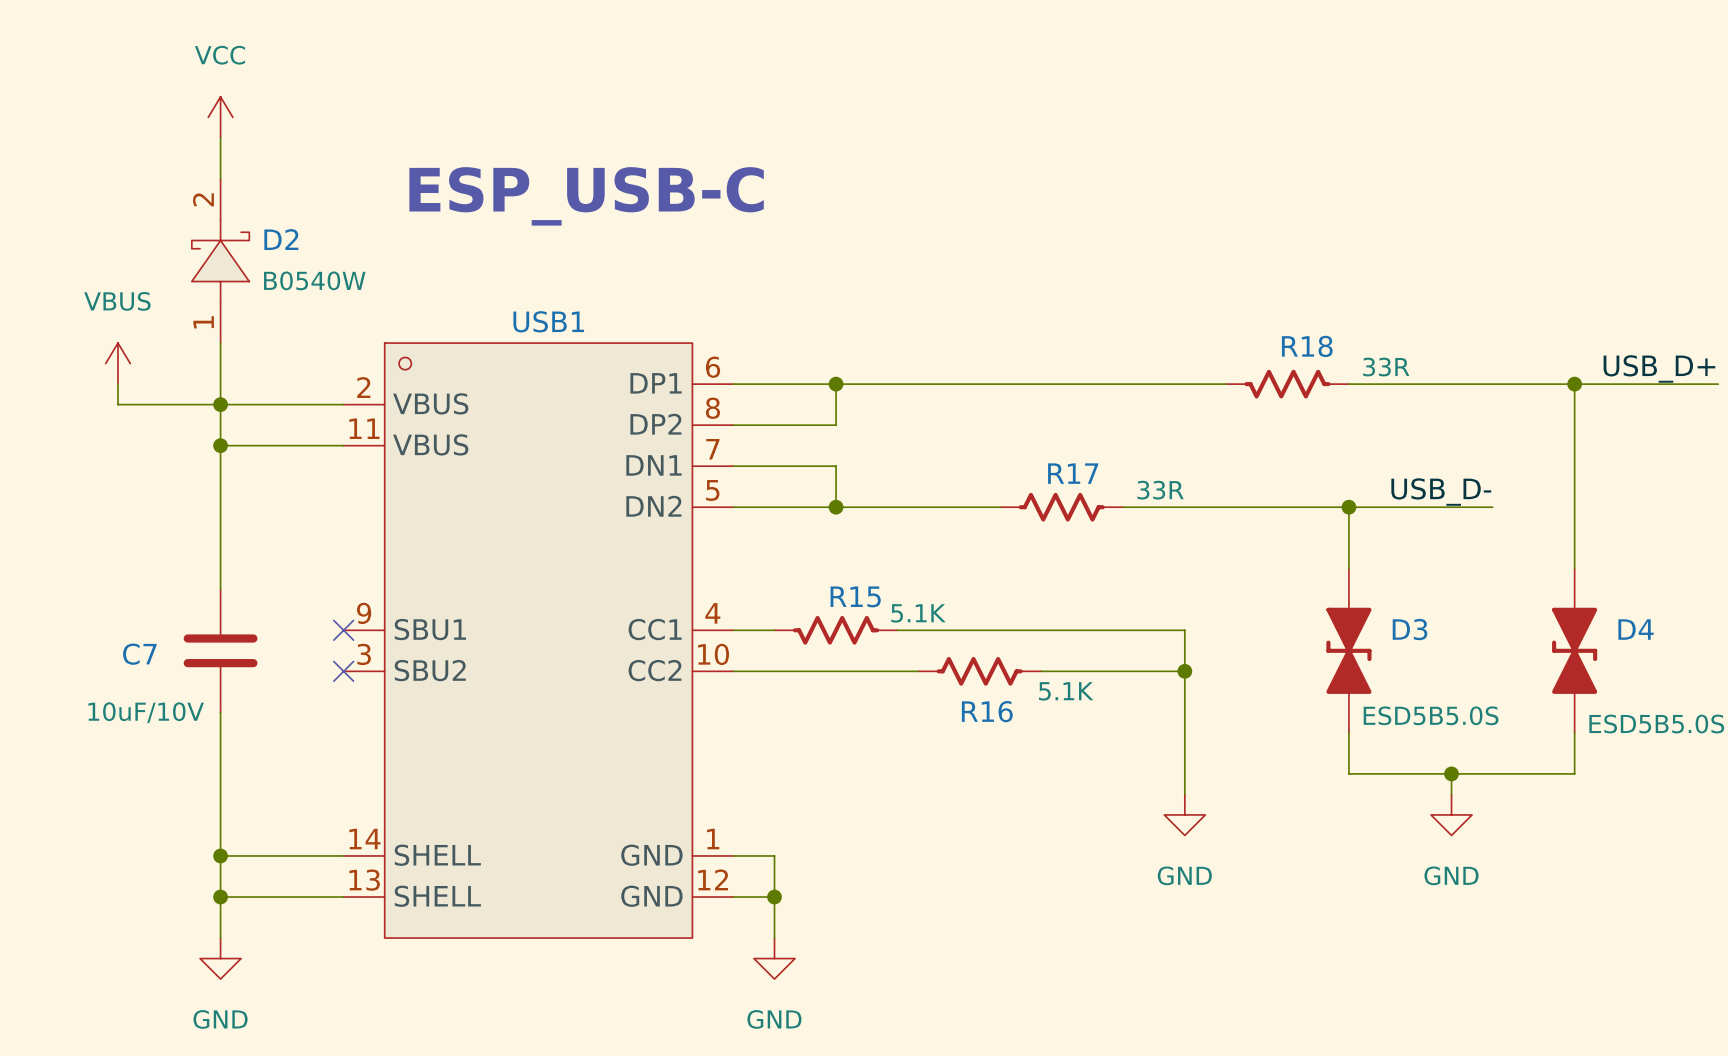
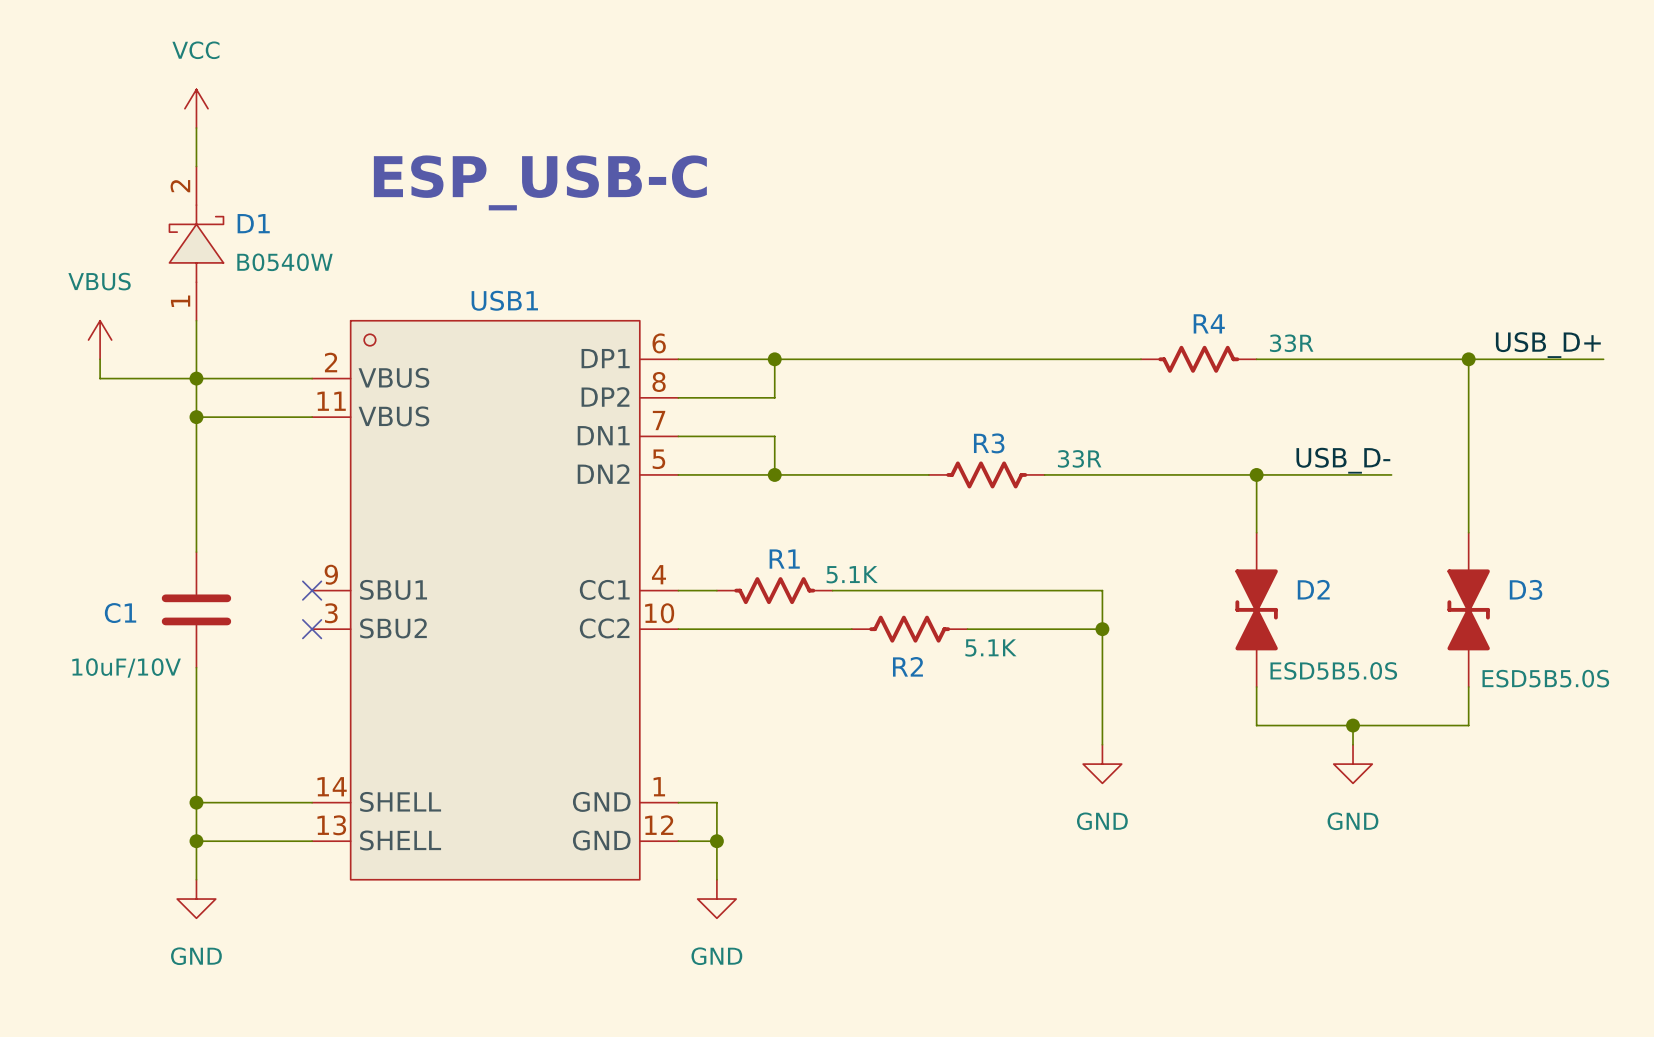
D2 name: D2 (281, 239) -> D1 (253, 223)
R18 name: R18 (1307, 346) -> R4 (1209, 323)
R17 name: R17 (1073, 473) -> R3 (989, 443)
R15 name: R15 (855, 596) -> R1 (784, 559)
D3 name: D3 (1410, 629) -> D2 (1313, 589)
D4 name: D4 (1636, 629) -> D3 (1526, 589)
C7 name: C7 (139, 654) -> C1 (120, 613)
R16 name: R16 (987, 711) -> R2 (907, 666)

